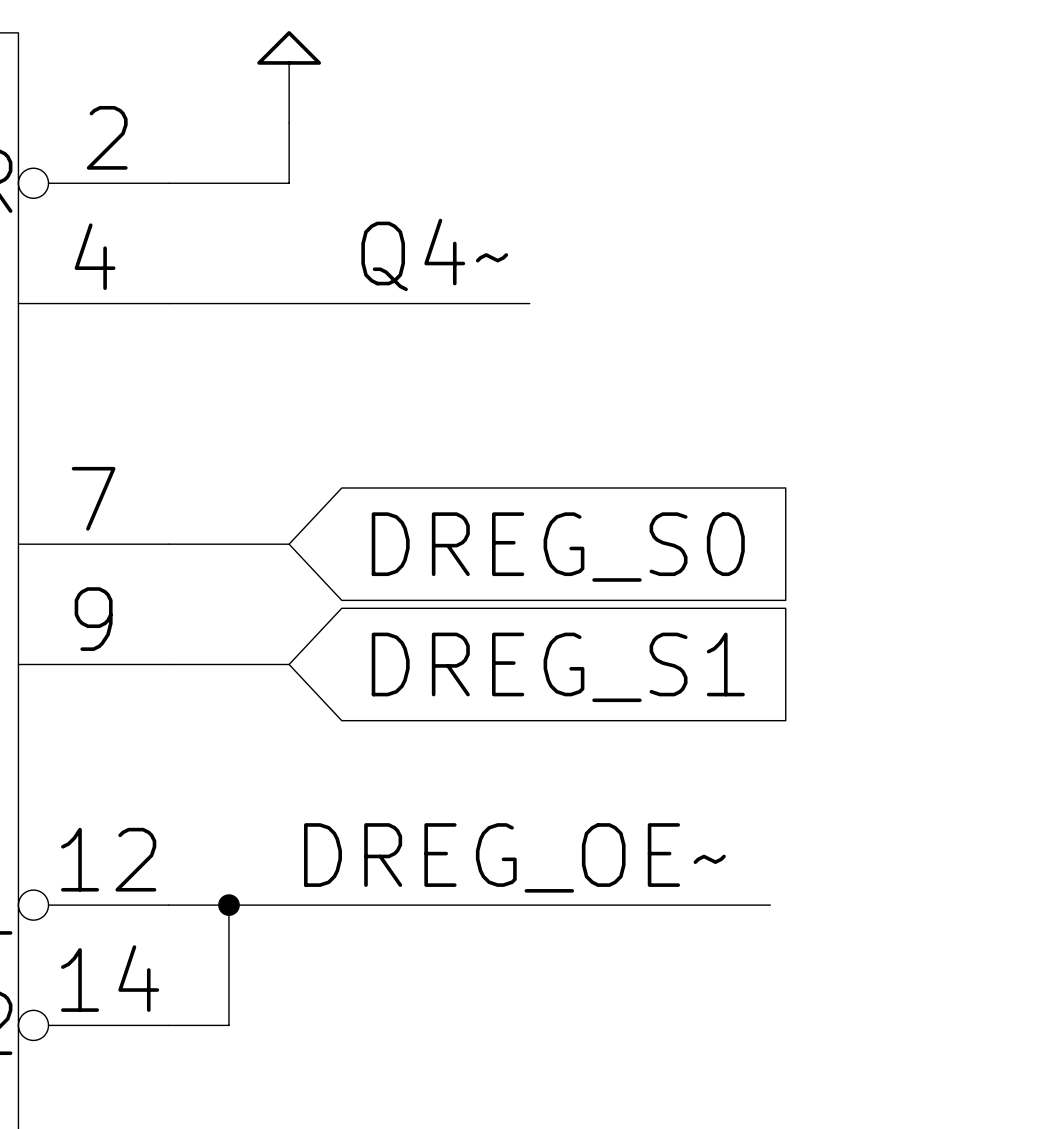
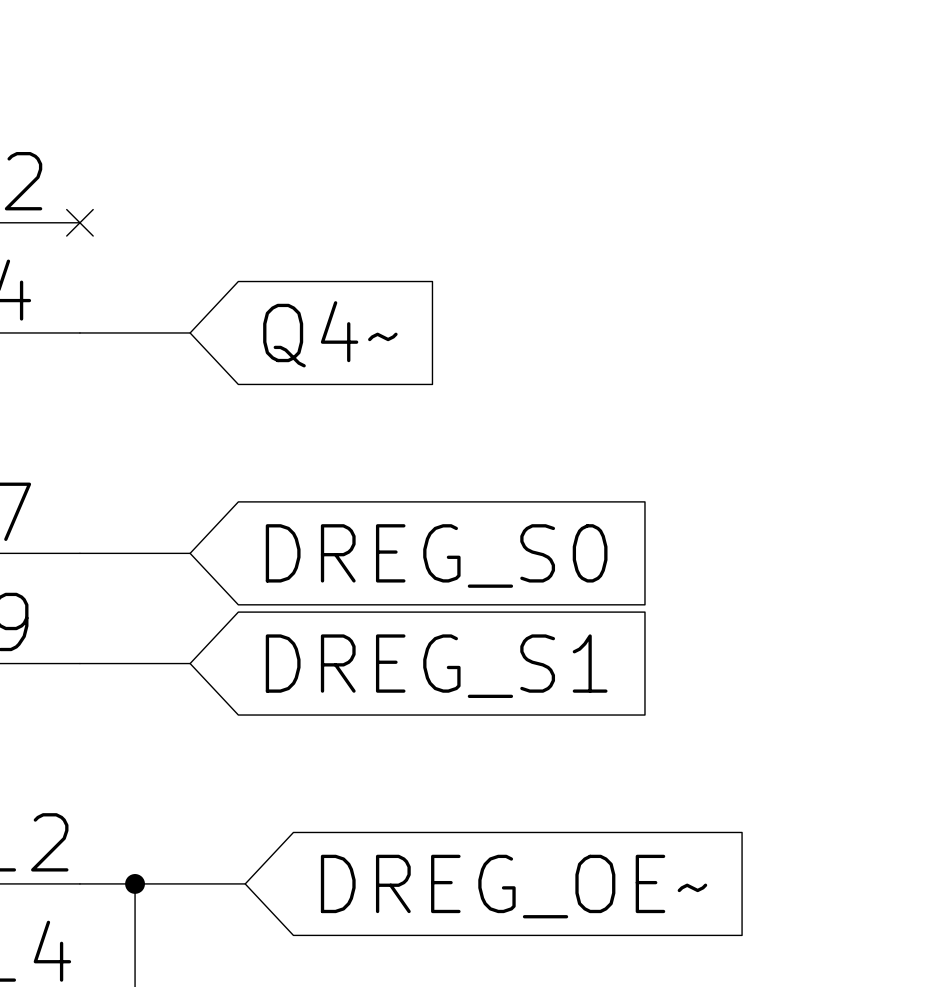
power symbol: (289, 77) -> none
wire: (289, 123) (289, 183) (168, 183) -> none
no-connect mark: none -> (79, 222)
label: Q4~ (434, 254) -> none
wire: (289, 303) (529, 303) -> none
global label: none -> Q4~ (330, 334)
label: DREG_OE~ (514, 857) -> none
wire: (349, 905) (770, 905) -> none
global label: none -> DREG_OE~ (514, 886)

